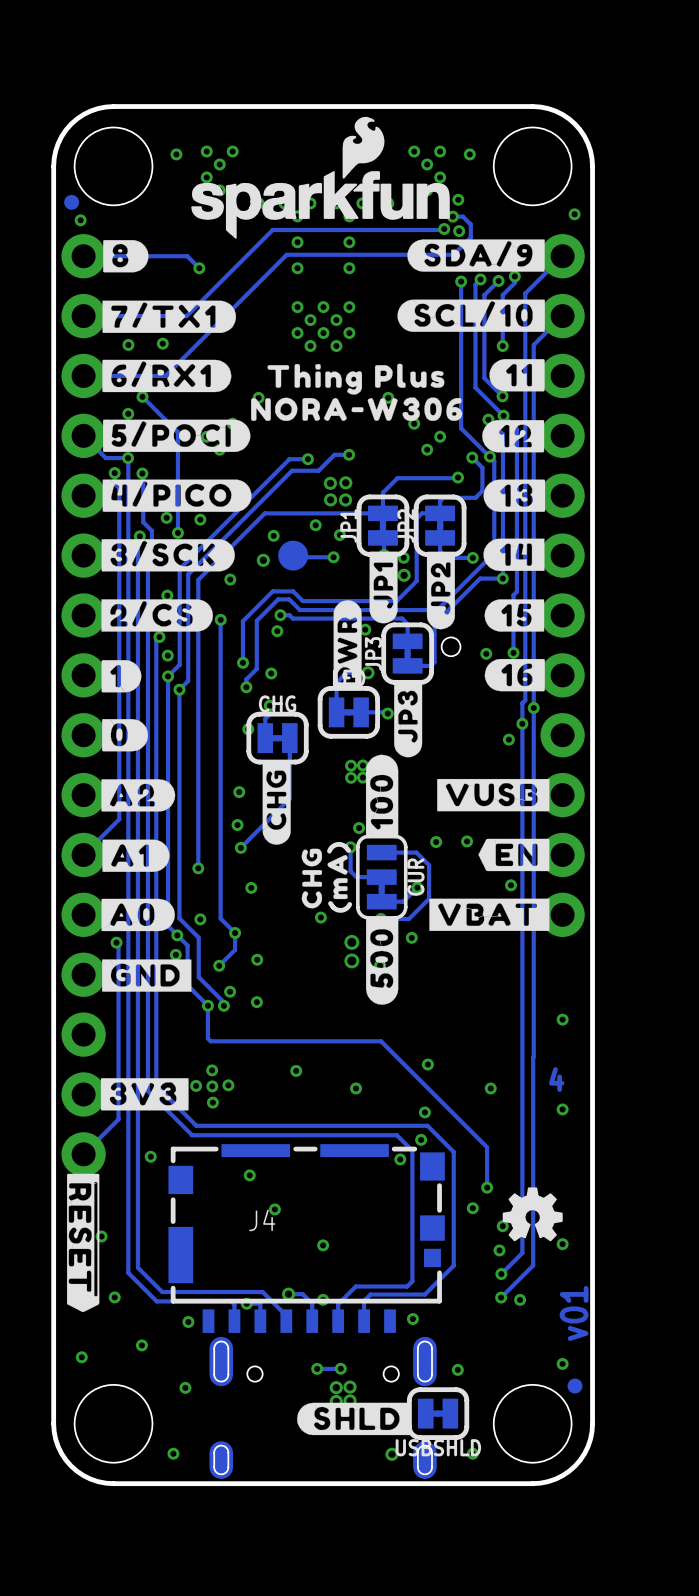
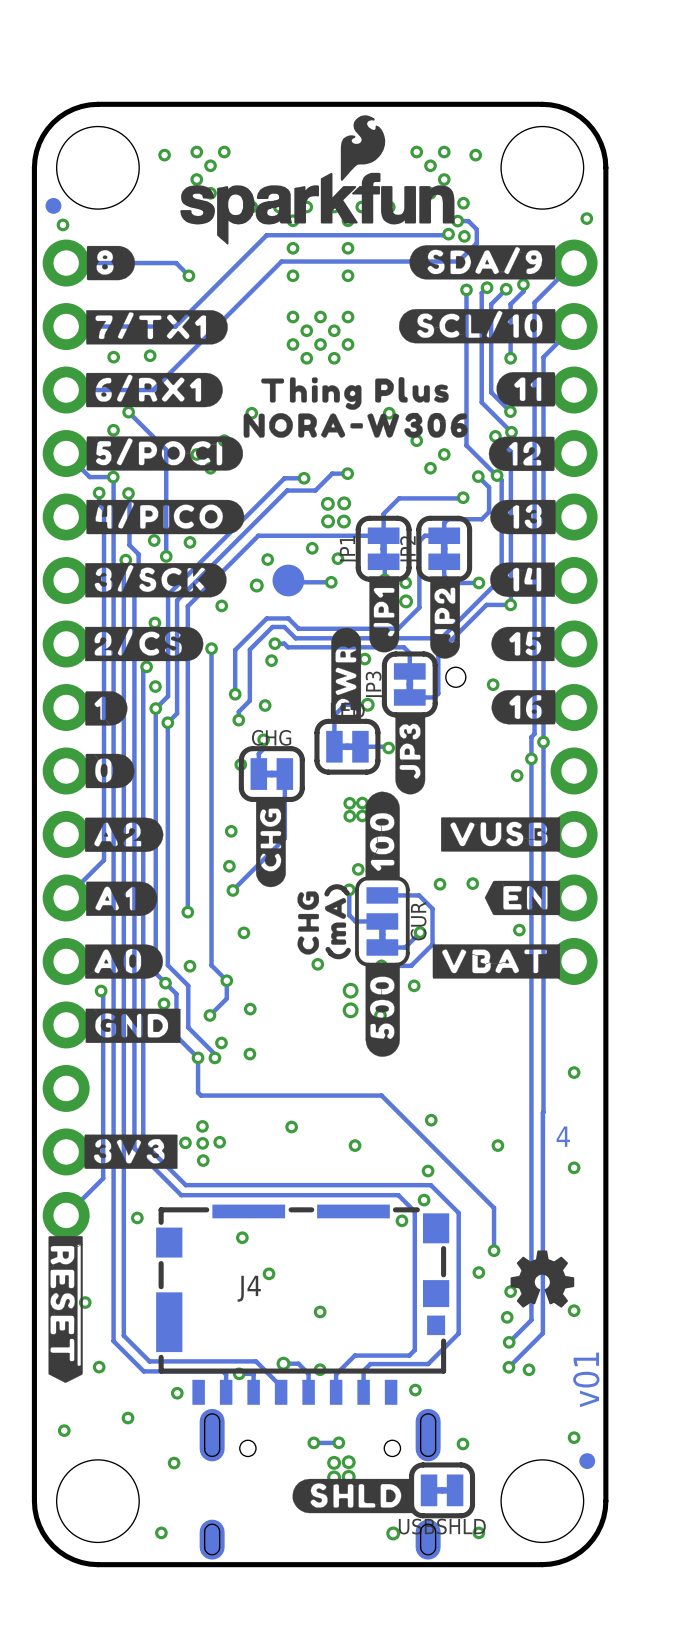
track: (503, 415) (516, 429) (516, 591) (513, 595) (513, 652) -> none
via: (513, 652) -> none

